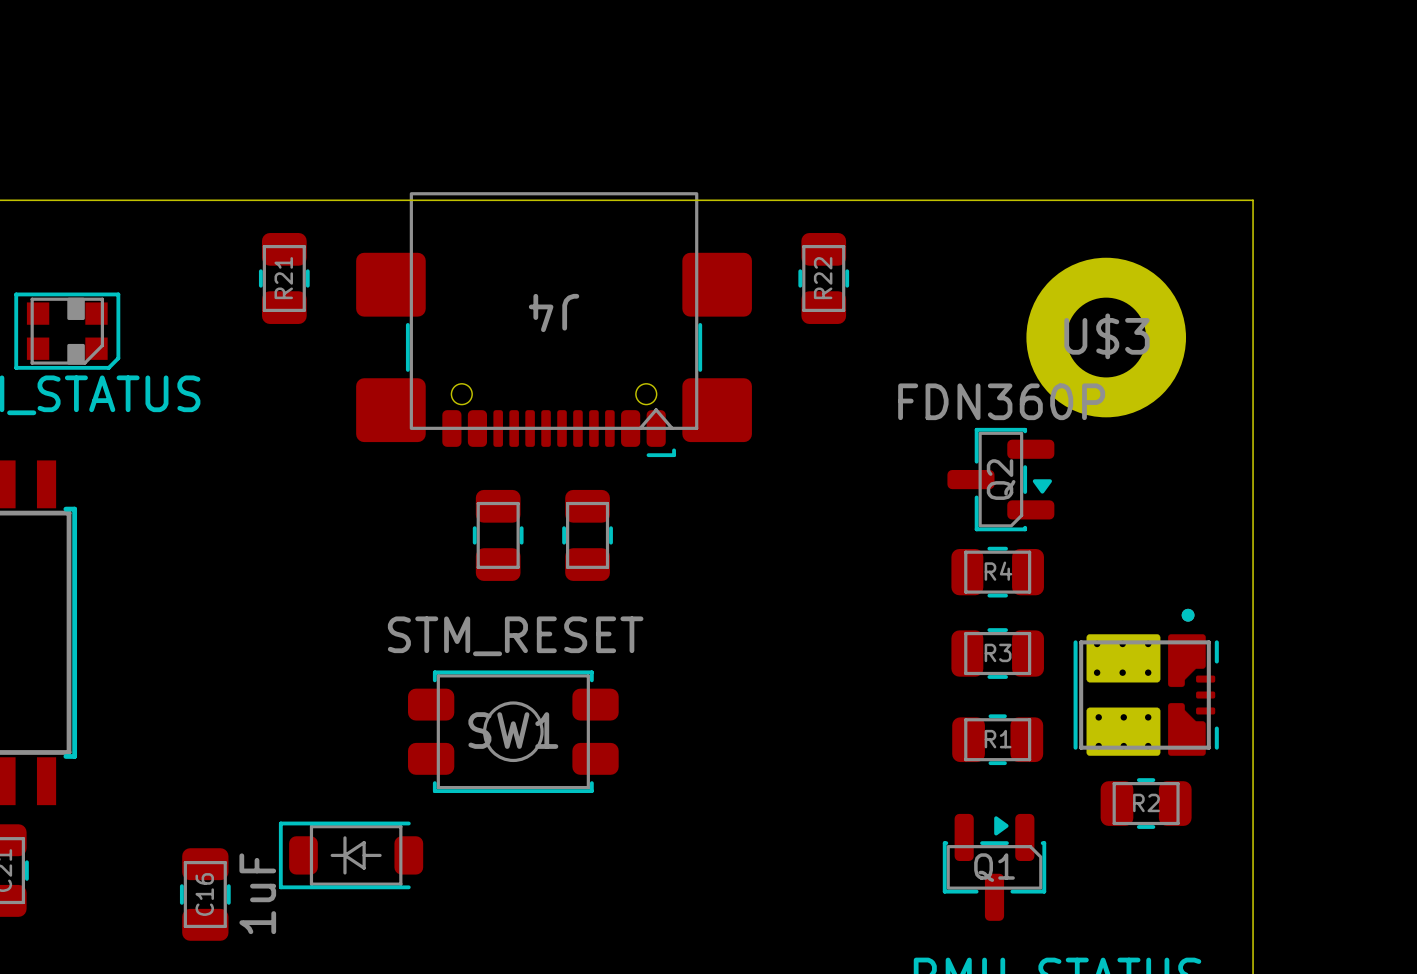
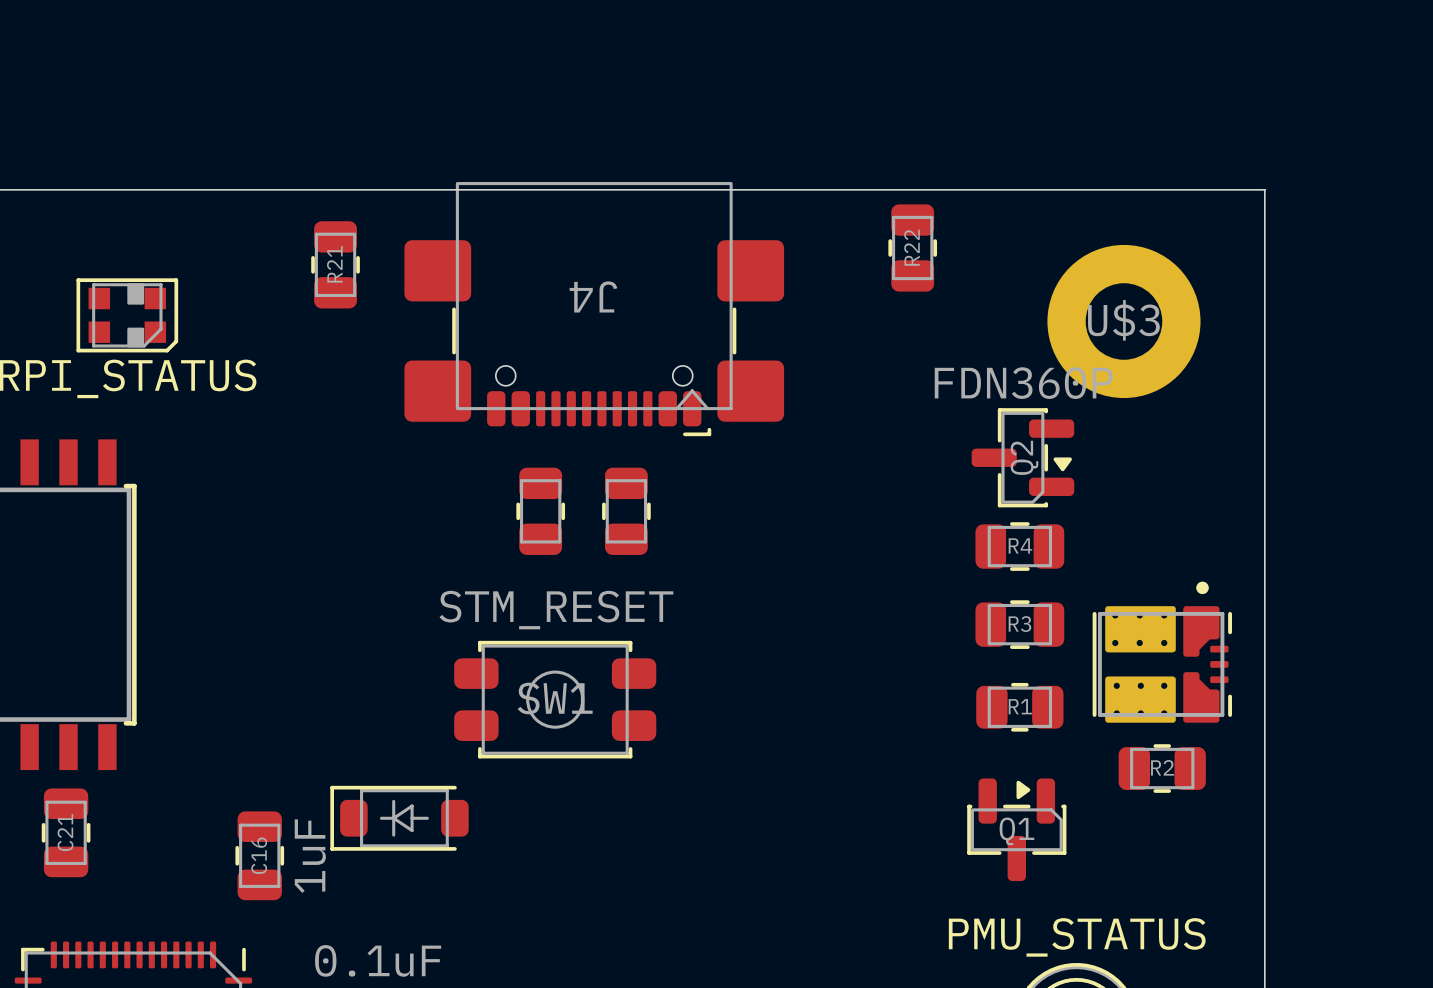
R22 position: (823, 278) -> (912, 248)

